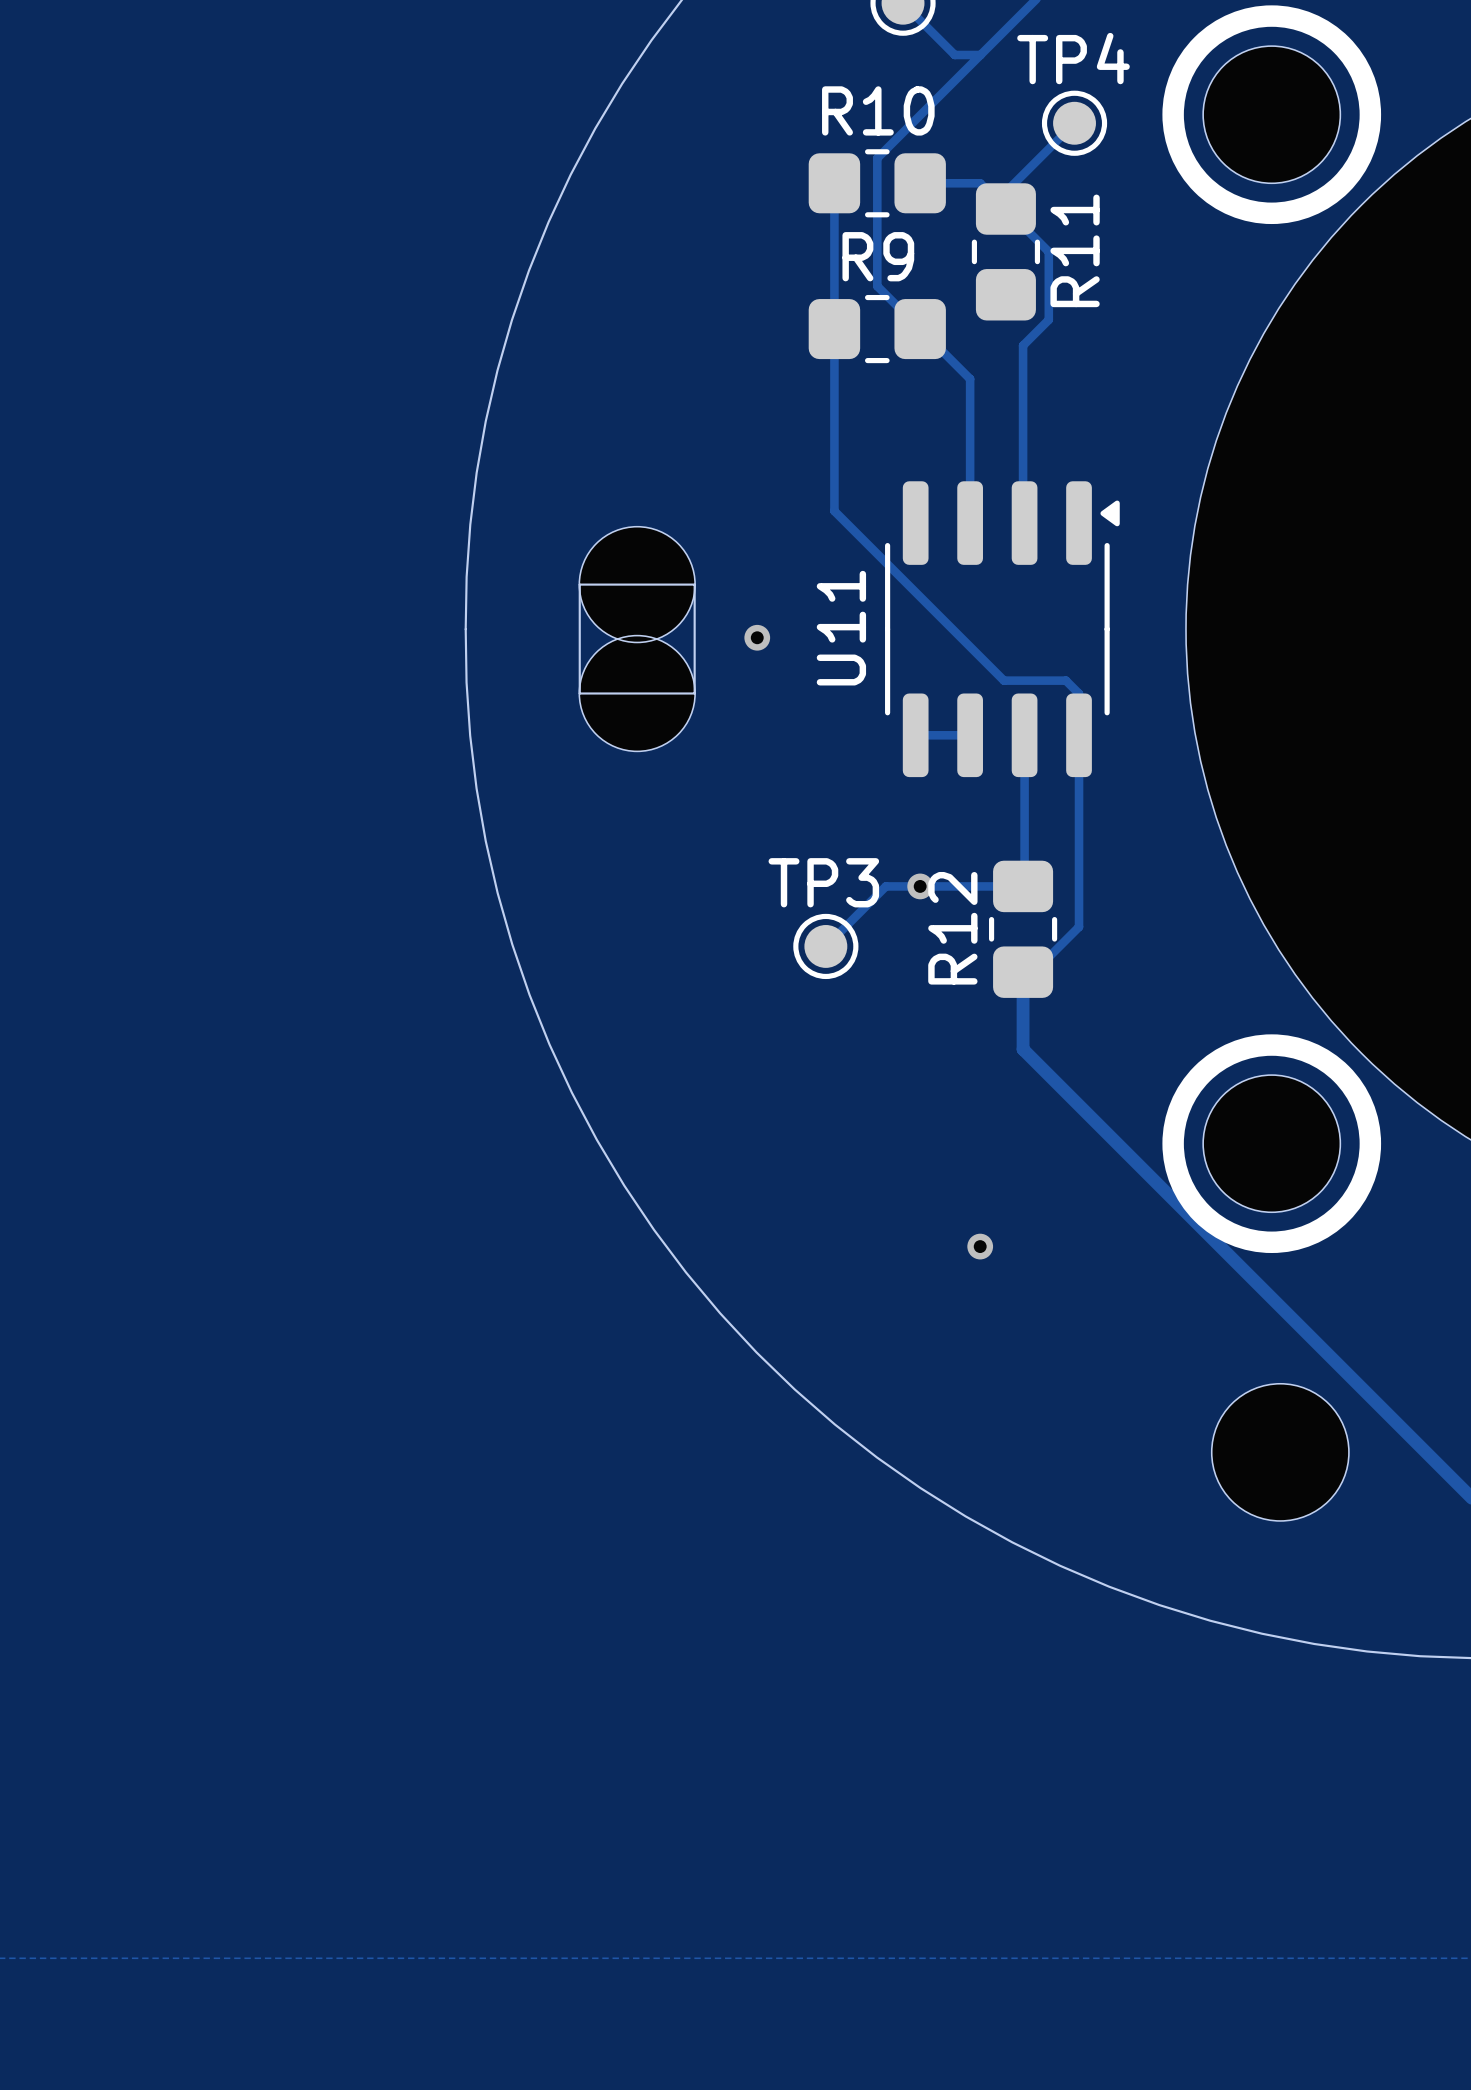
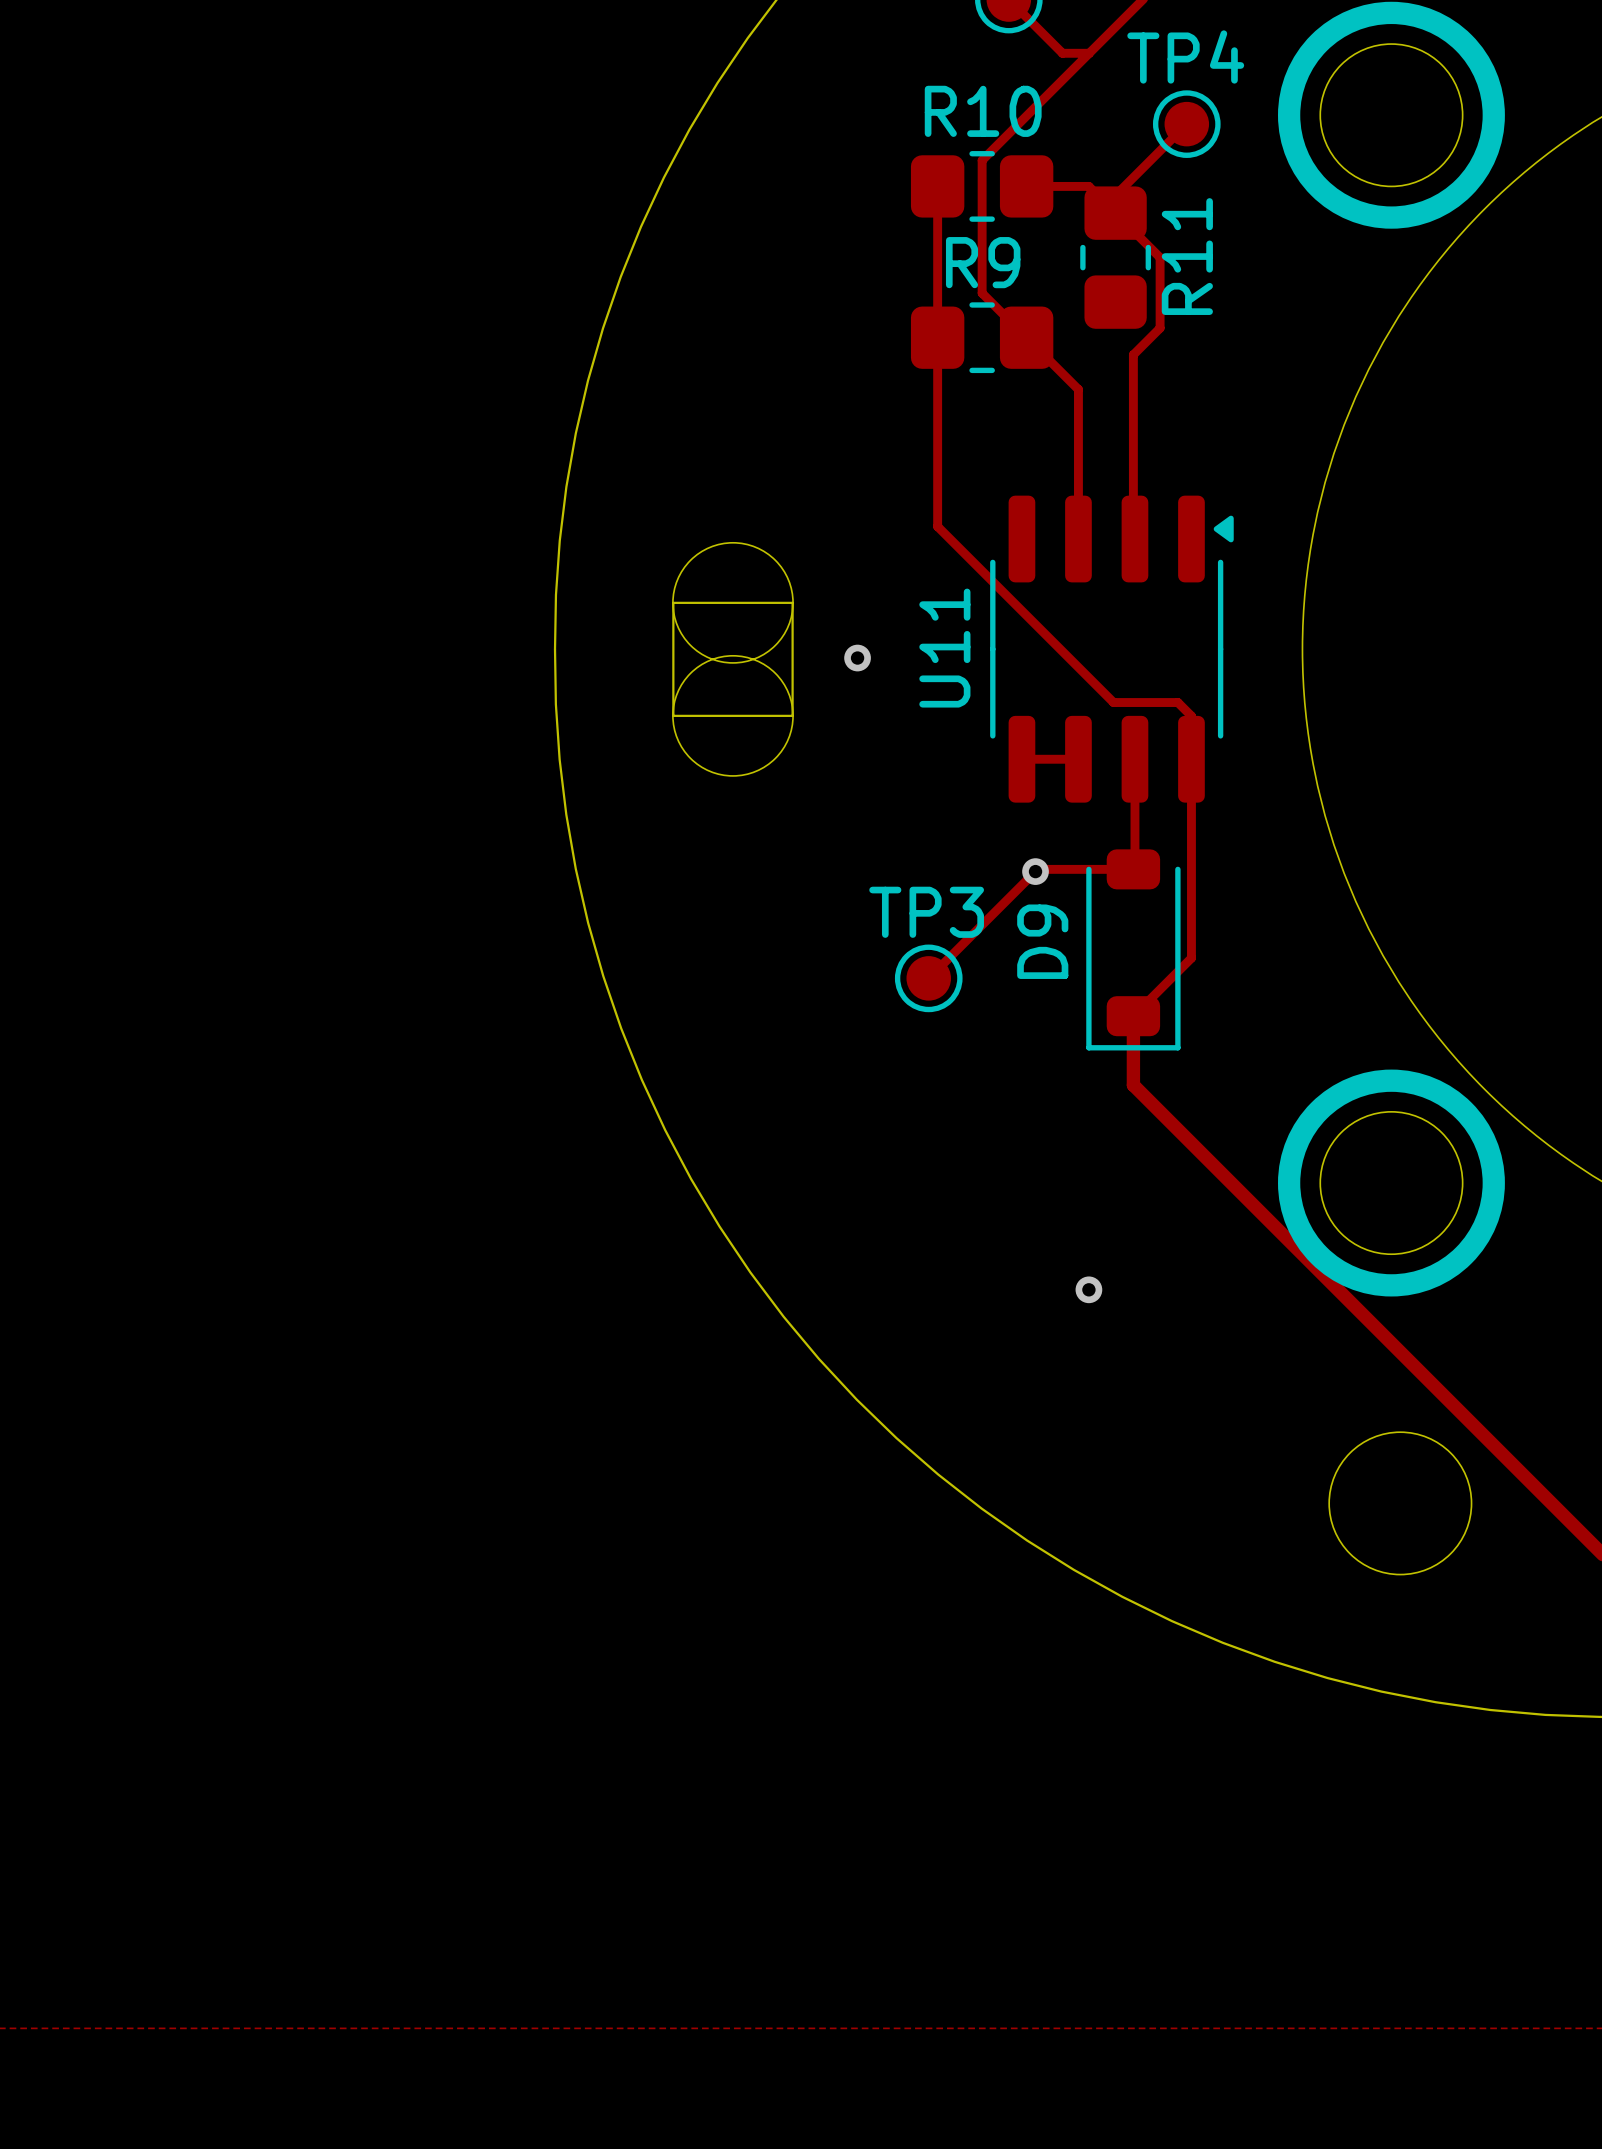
track: (1024, 839) (1023, 886) (885, 886) -> (1134, 867) (1133, 869) (1037, 869) (991, 916)
via position: (920, 886) -> (1035, 871)
D9: none -> (1133, 949)
R12: (1023, 929) -> none

